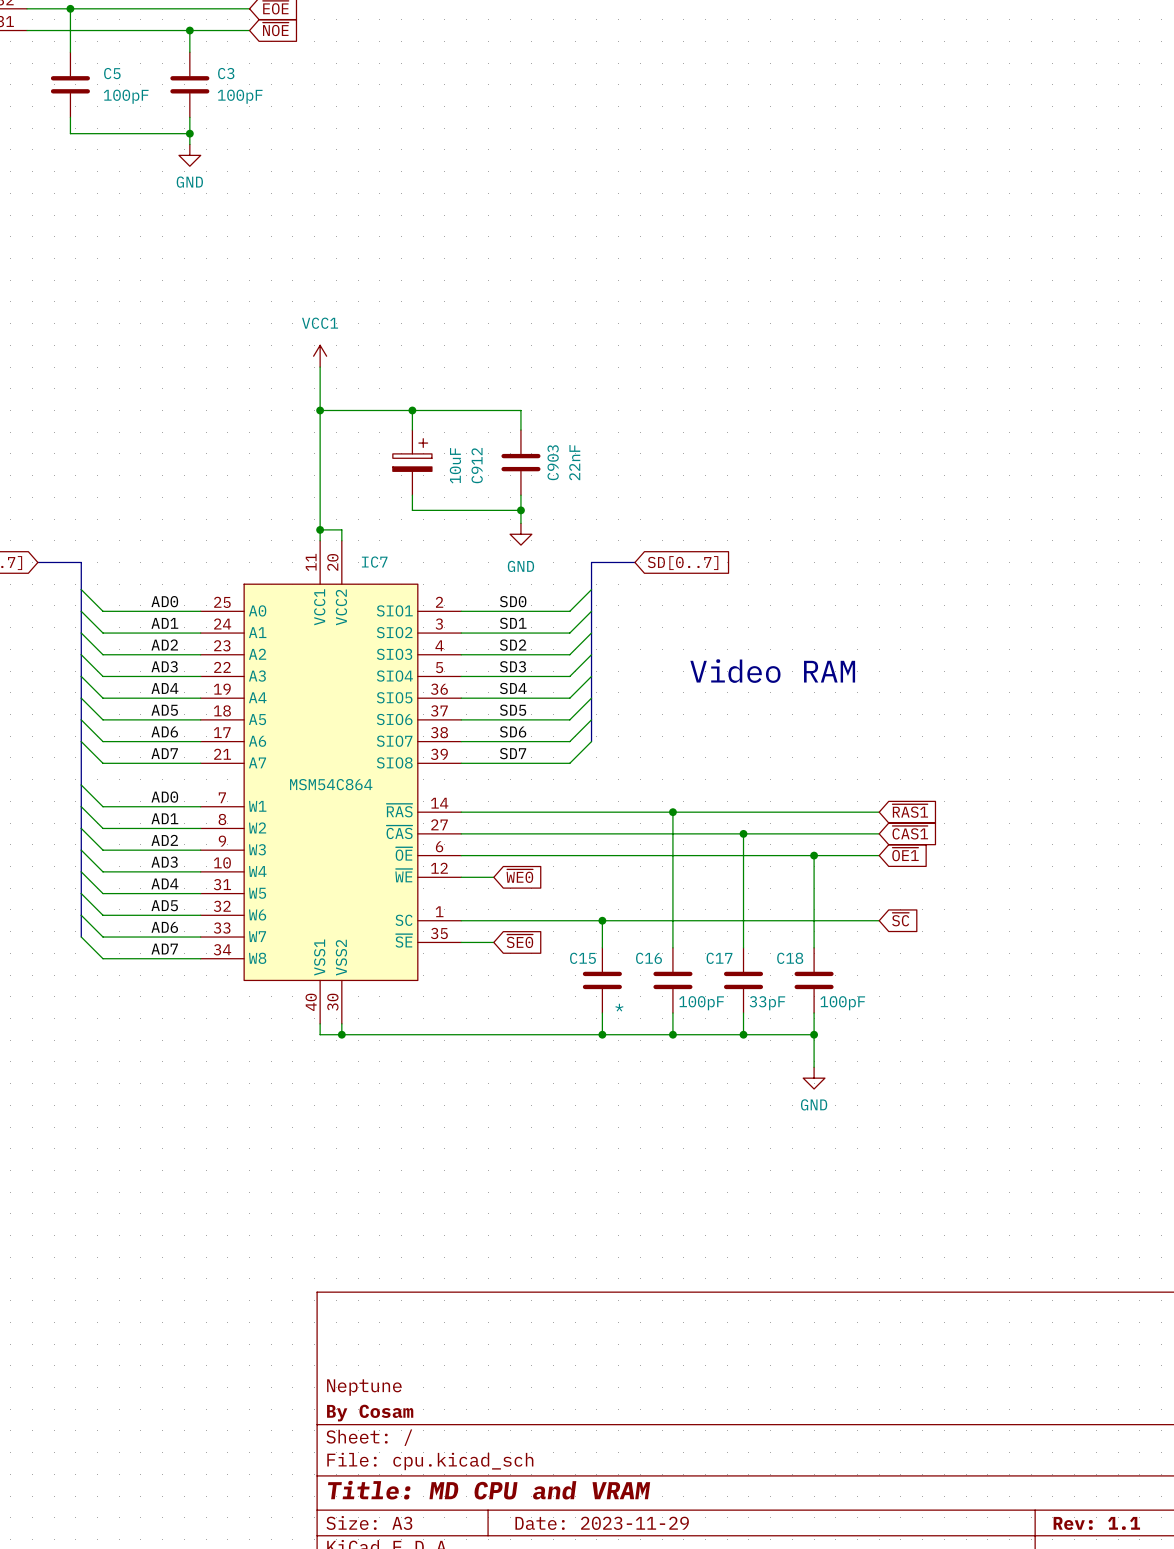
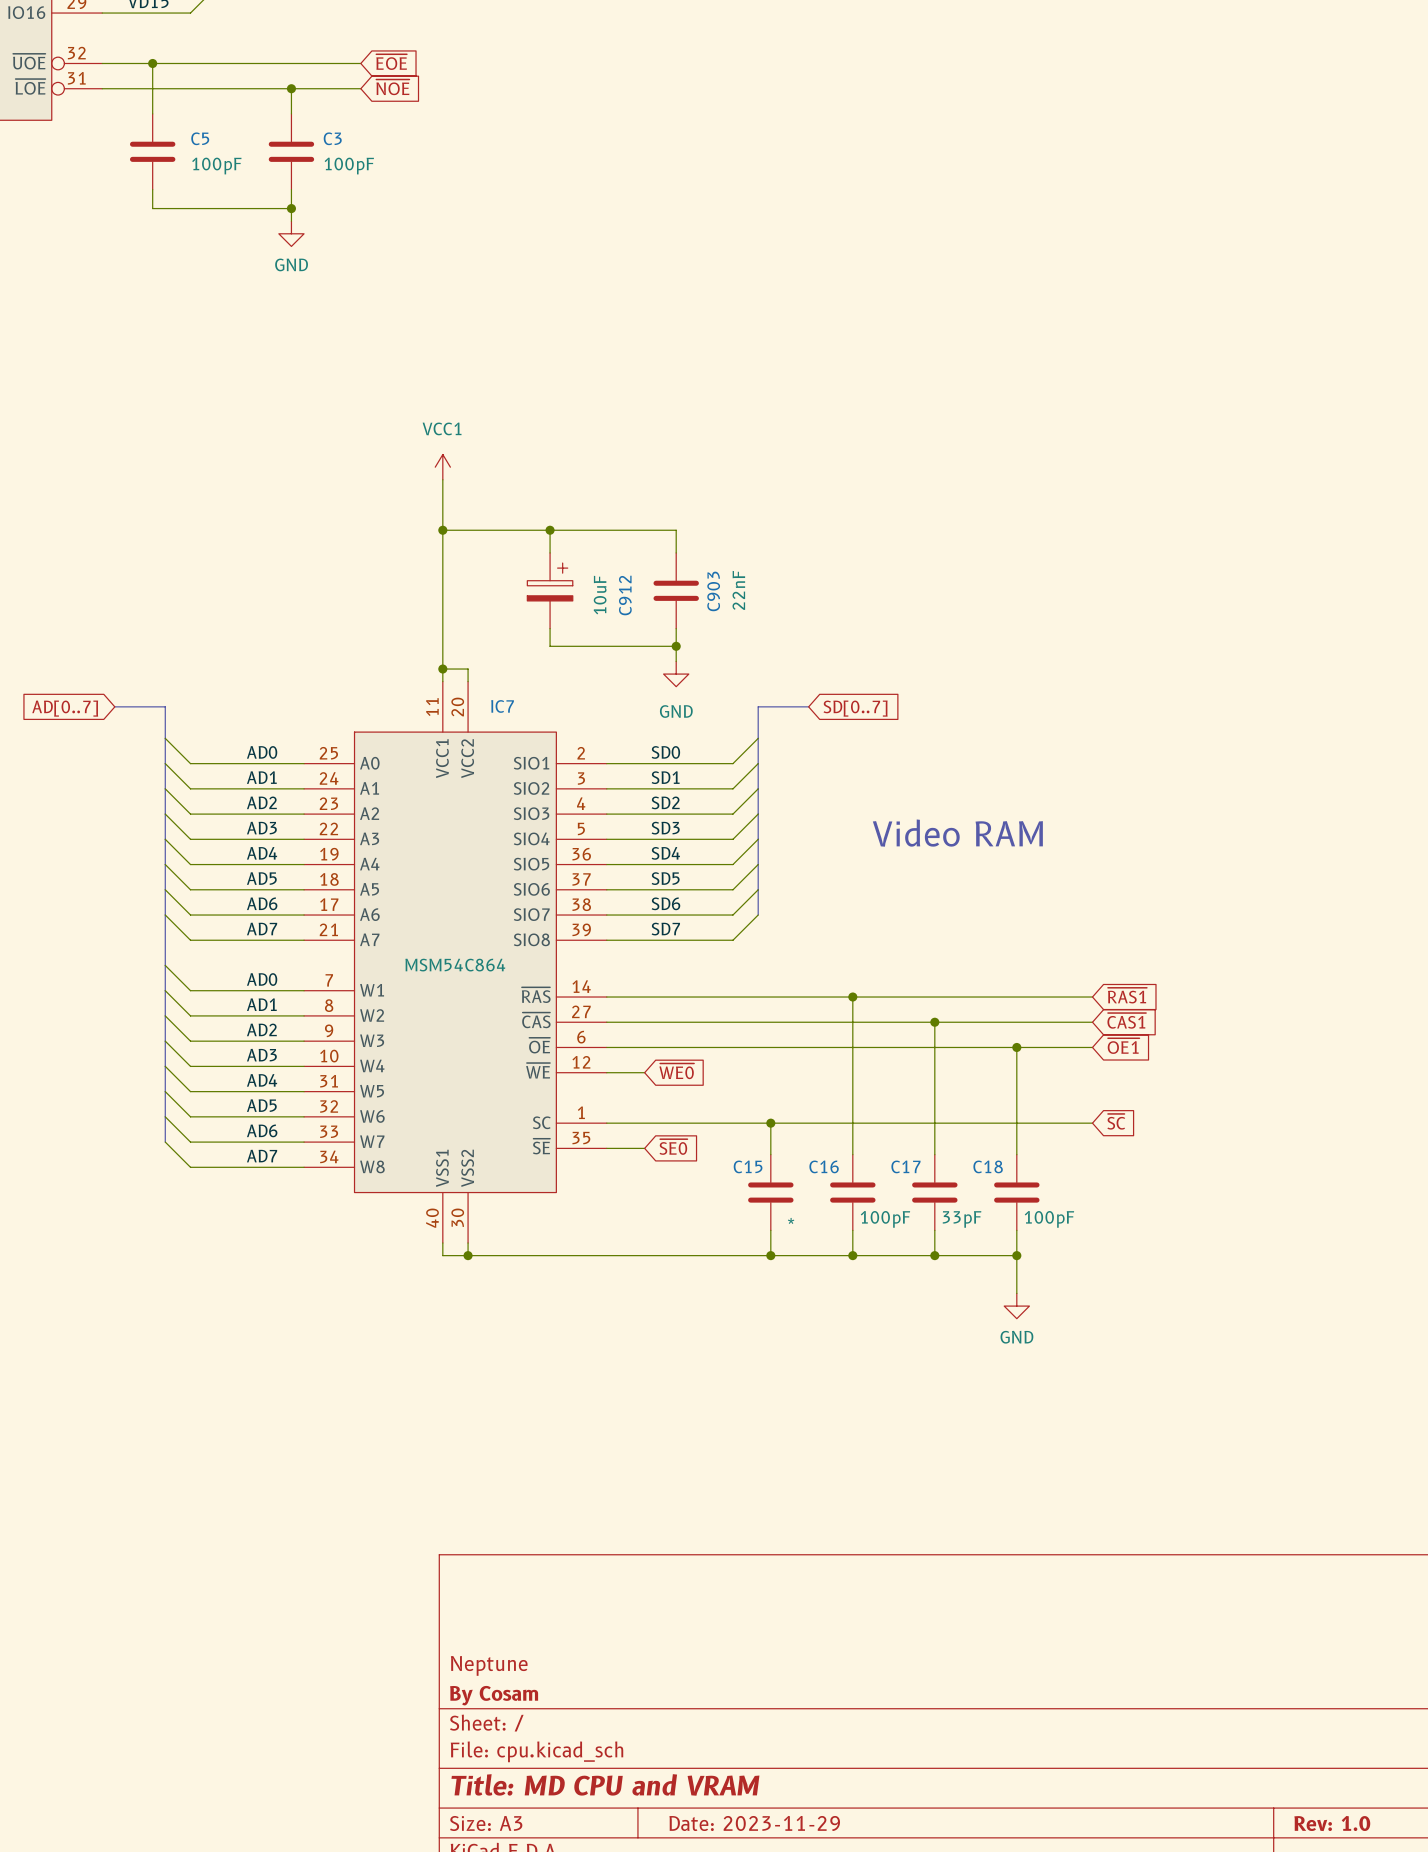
title block: Rev: 1.1 (1096, 1523) -> Rev: 1.0 (1332, 1823)

